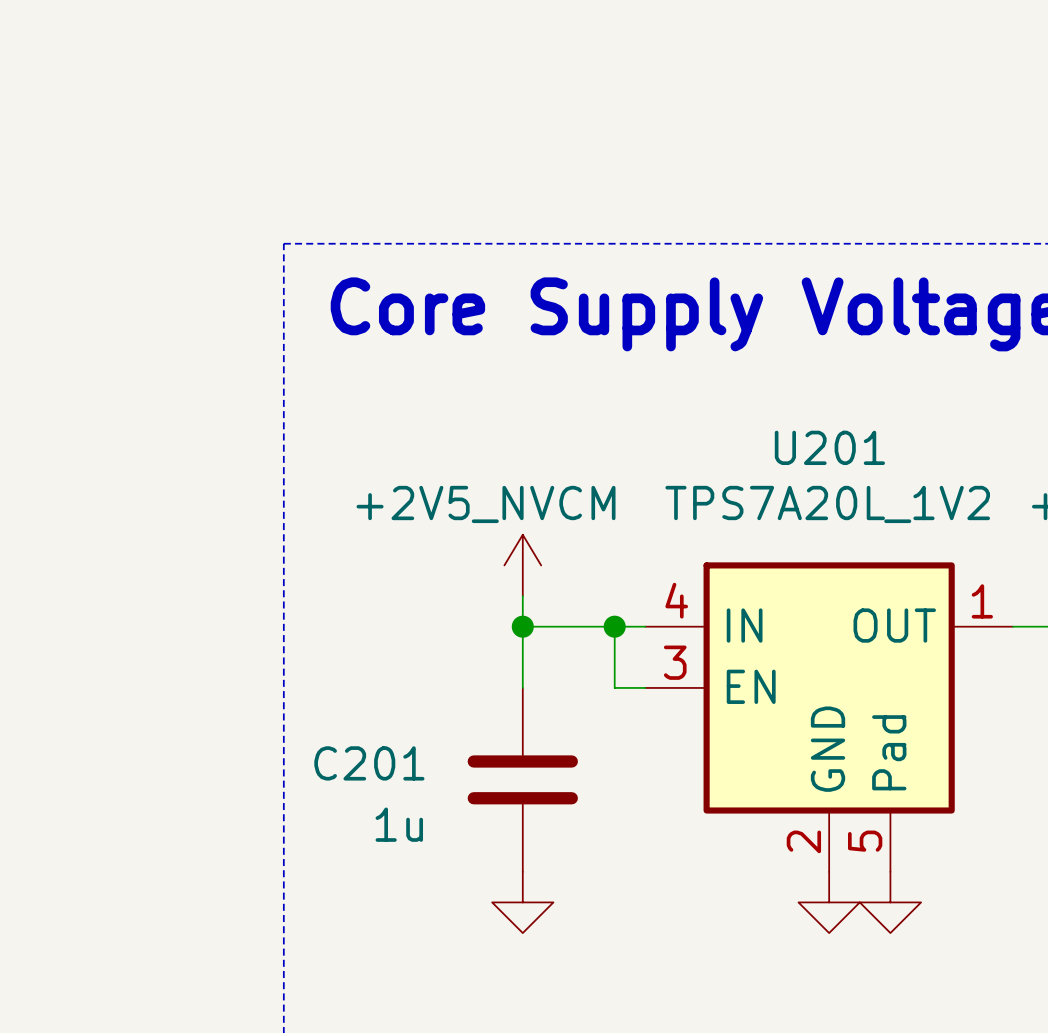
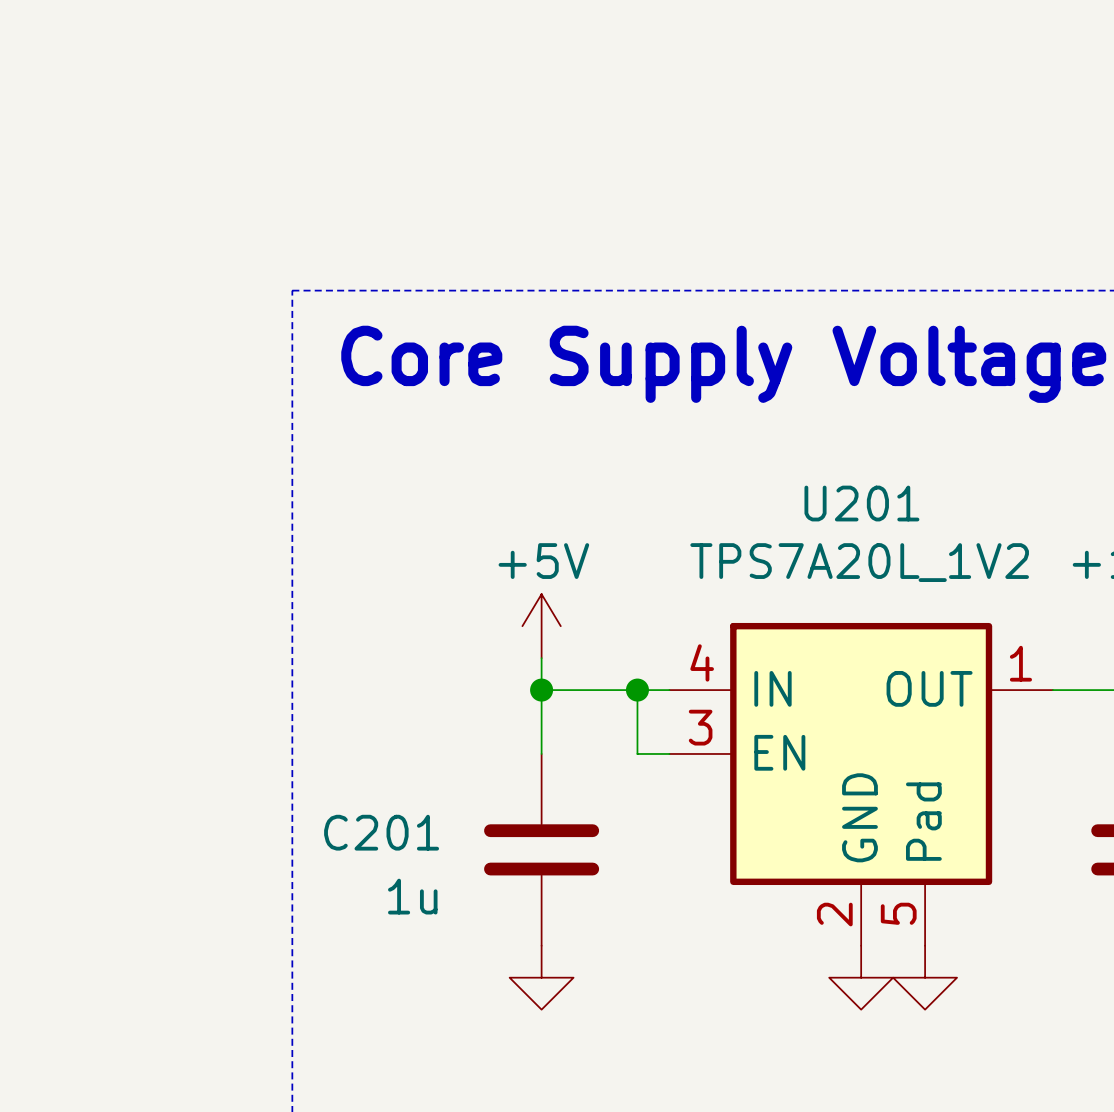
power symbol: +2V5_NVCM (522, 565) -> +5V (541, 626)

